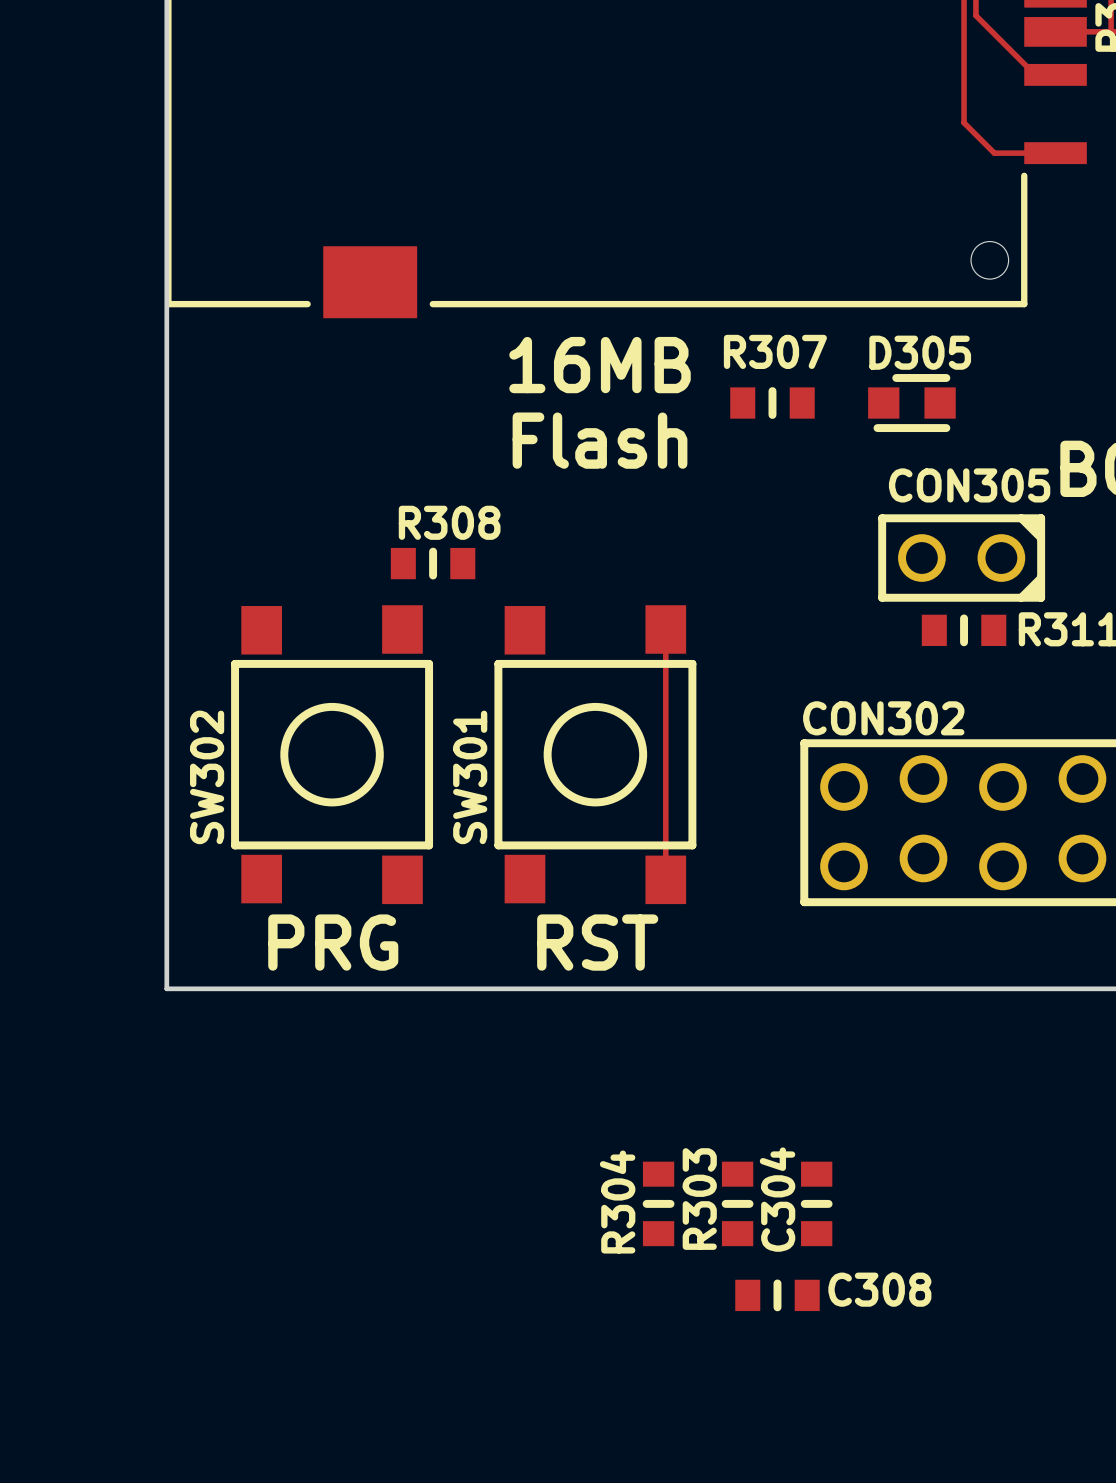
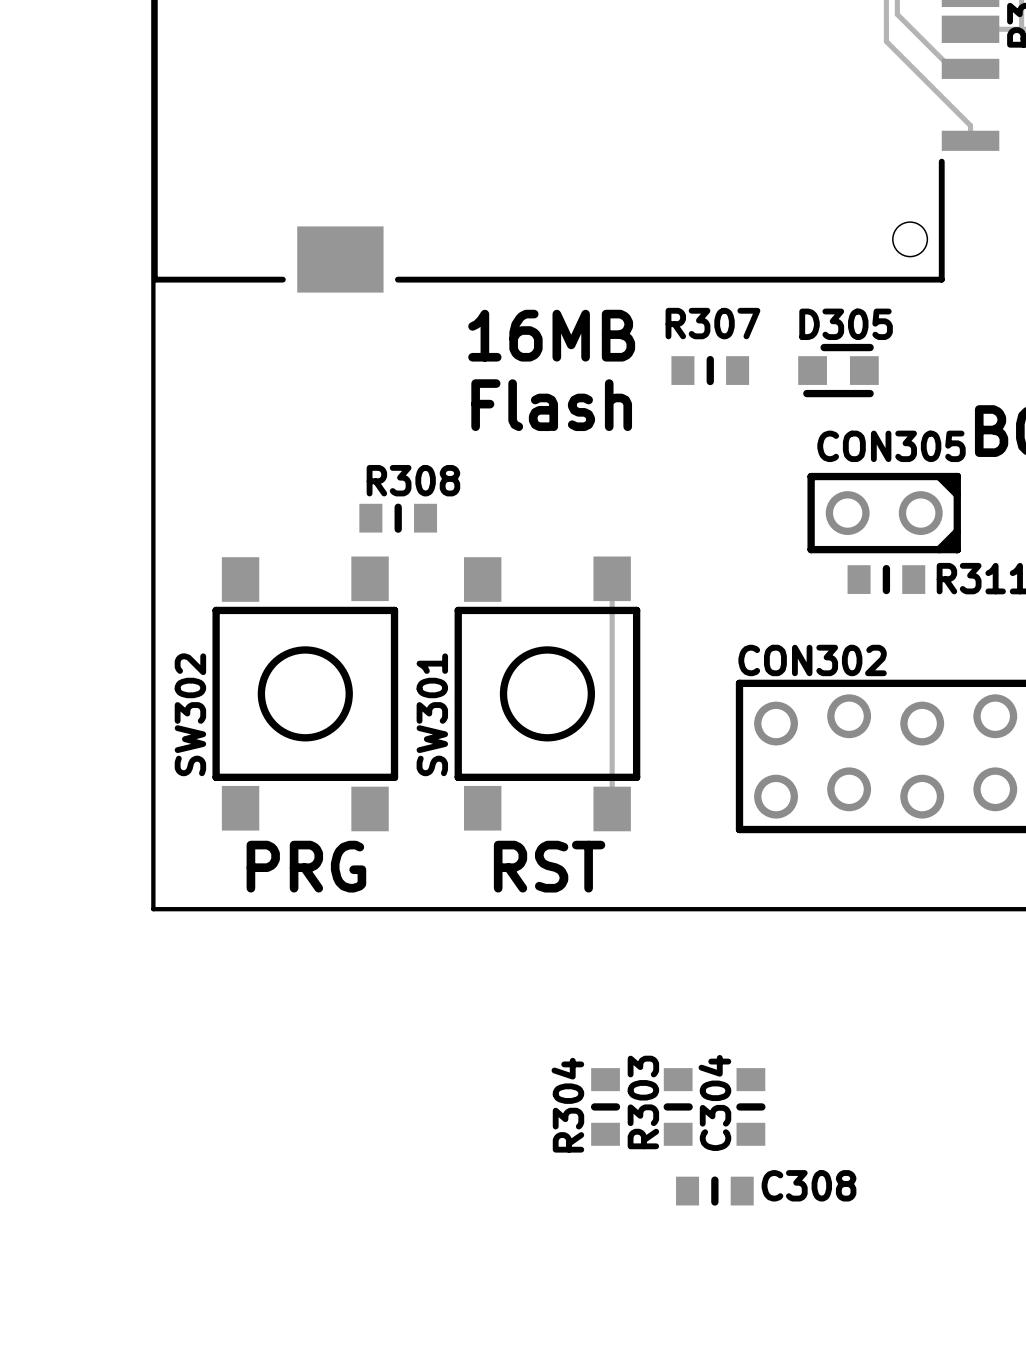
track: (964, 45) (964, 122) (994, 153) (1055, 153) -> (886, 41) (970, 125) (970, 140)

